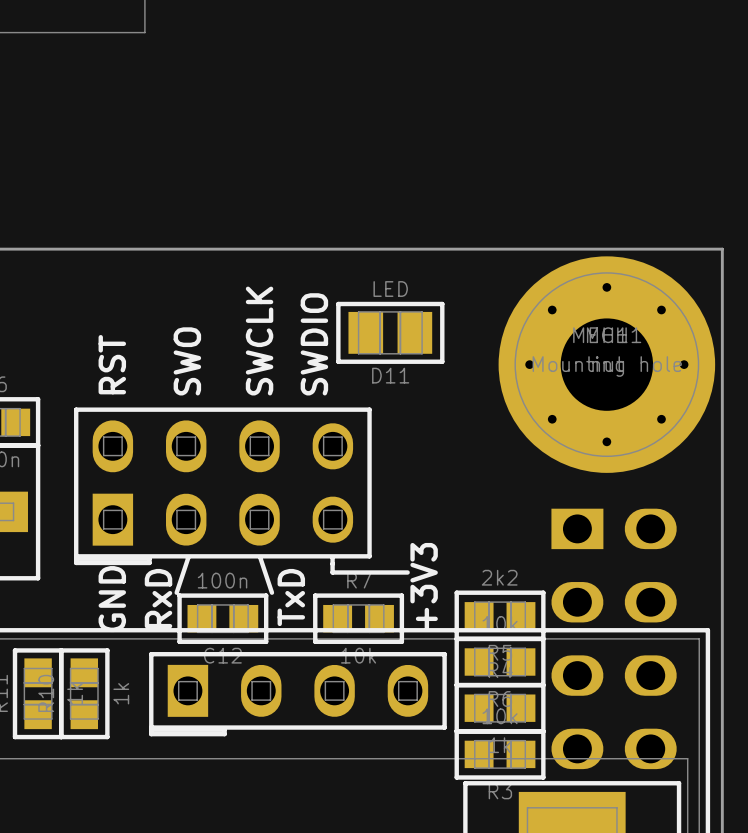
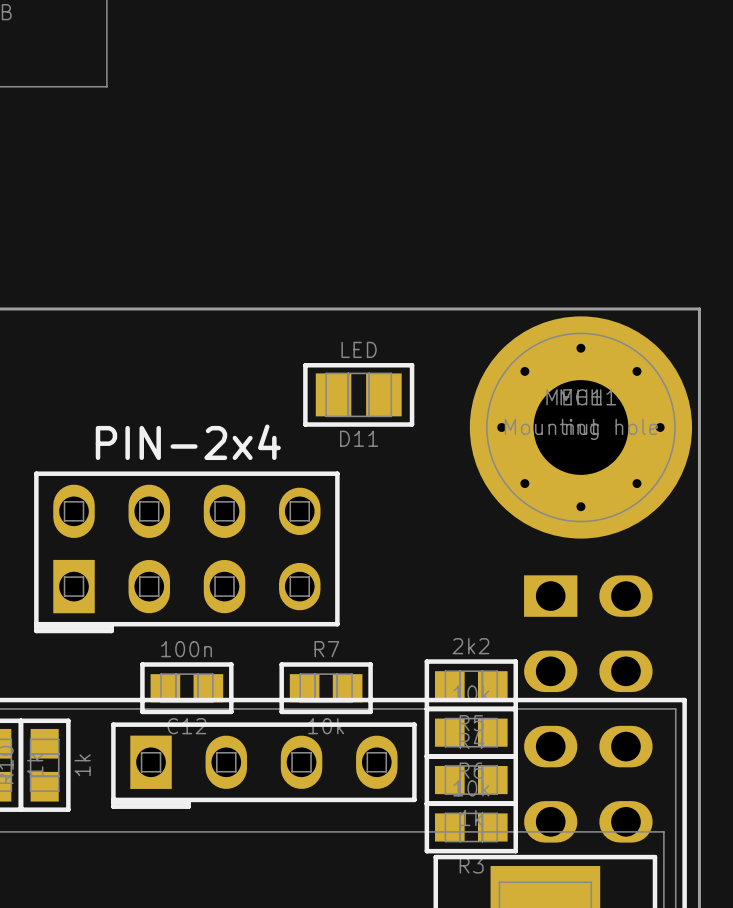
text: SWCLK (259, 341) -> none
text: SWDIO (314, 344) -> none
text: SWO (187, 361) -> none
text: RST (112, 364) -> none
part value: none -> PIN-2x4 (188, 442)
line: (188, 558) (176, 592) -> none
line: (260, 558) (271, 592) -> none
line: (332, 558) (332, 572) (407, 572) -> none
text: +3V3 (424, 586) -> none
text: TxD (291, 597) -> none
text: RxD (158, 598) -> none
text: GND (112, 599) -> none

